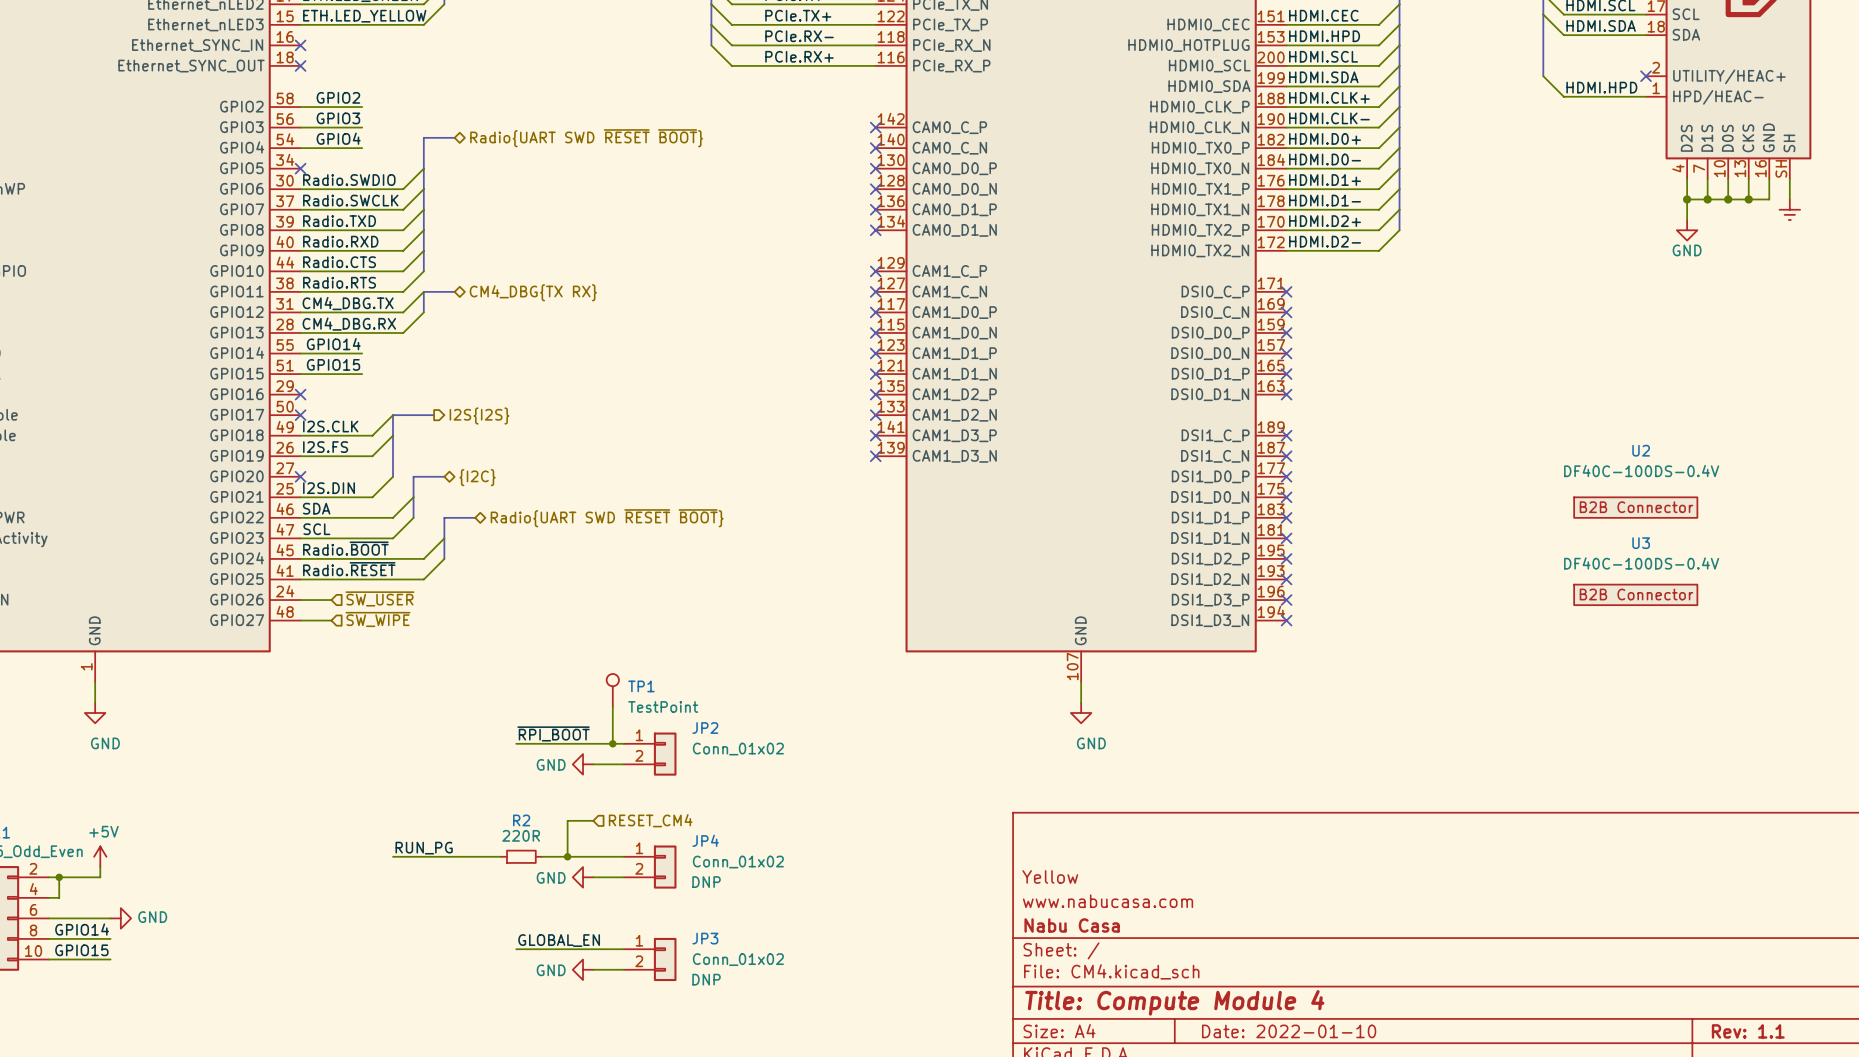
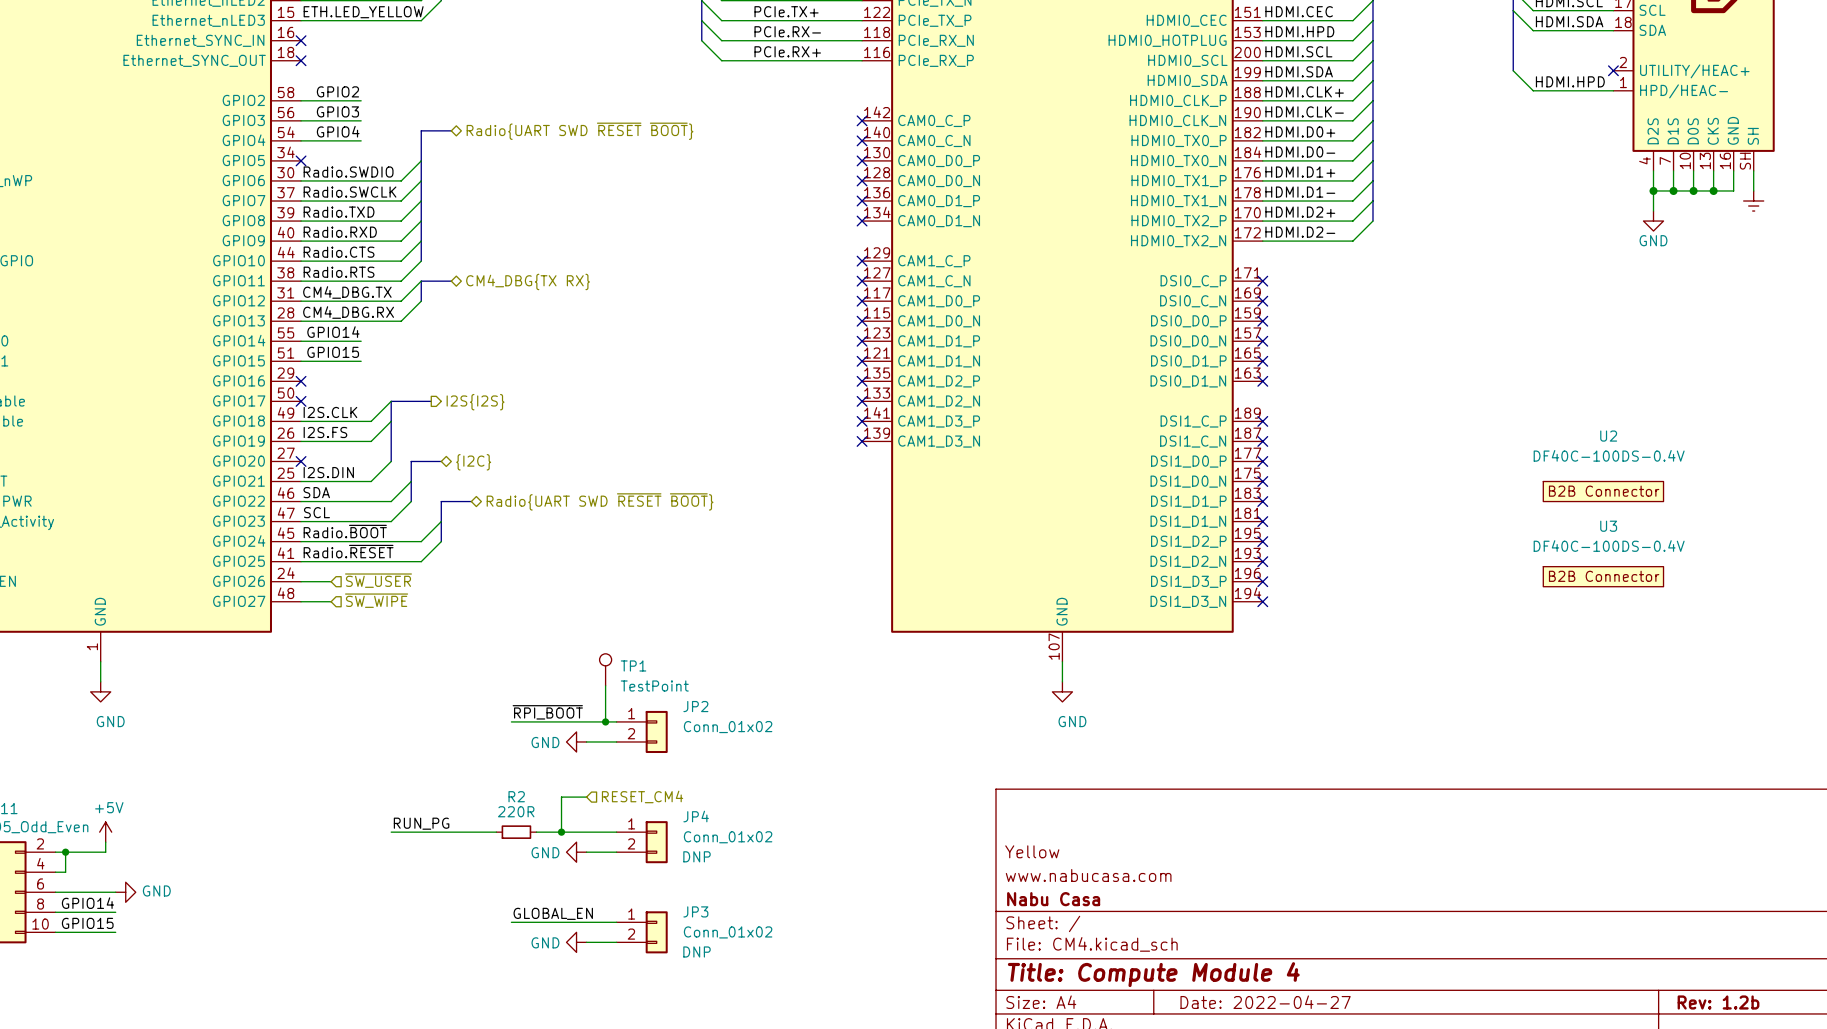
title block: Date: 2022-01-10 (1289, 1031) -> Date: 2022-04-27 (1265, 1002)
title block: Rev: 1.1 (1748, 1031) -> Rev: 1.2b (1718, 1002)

